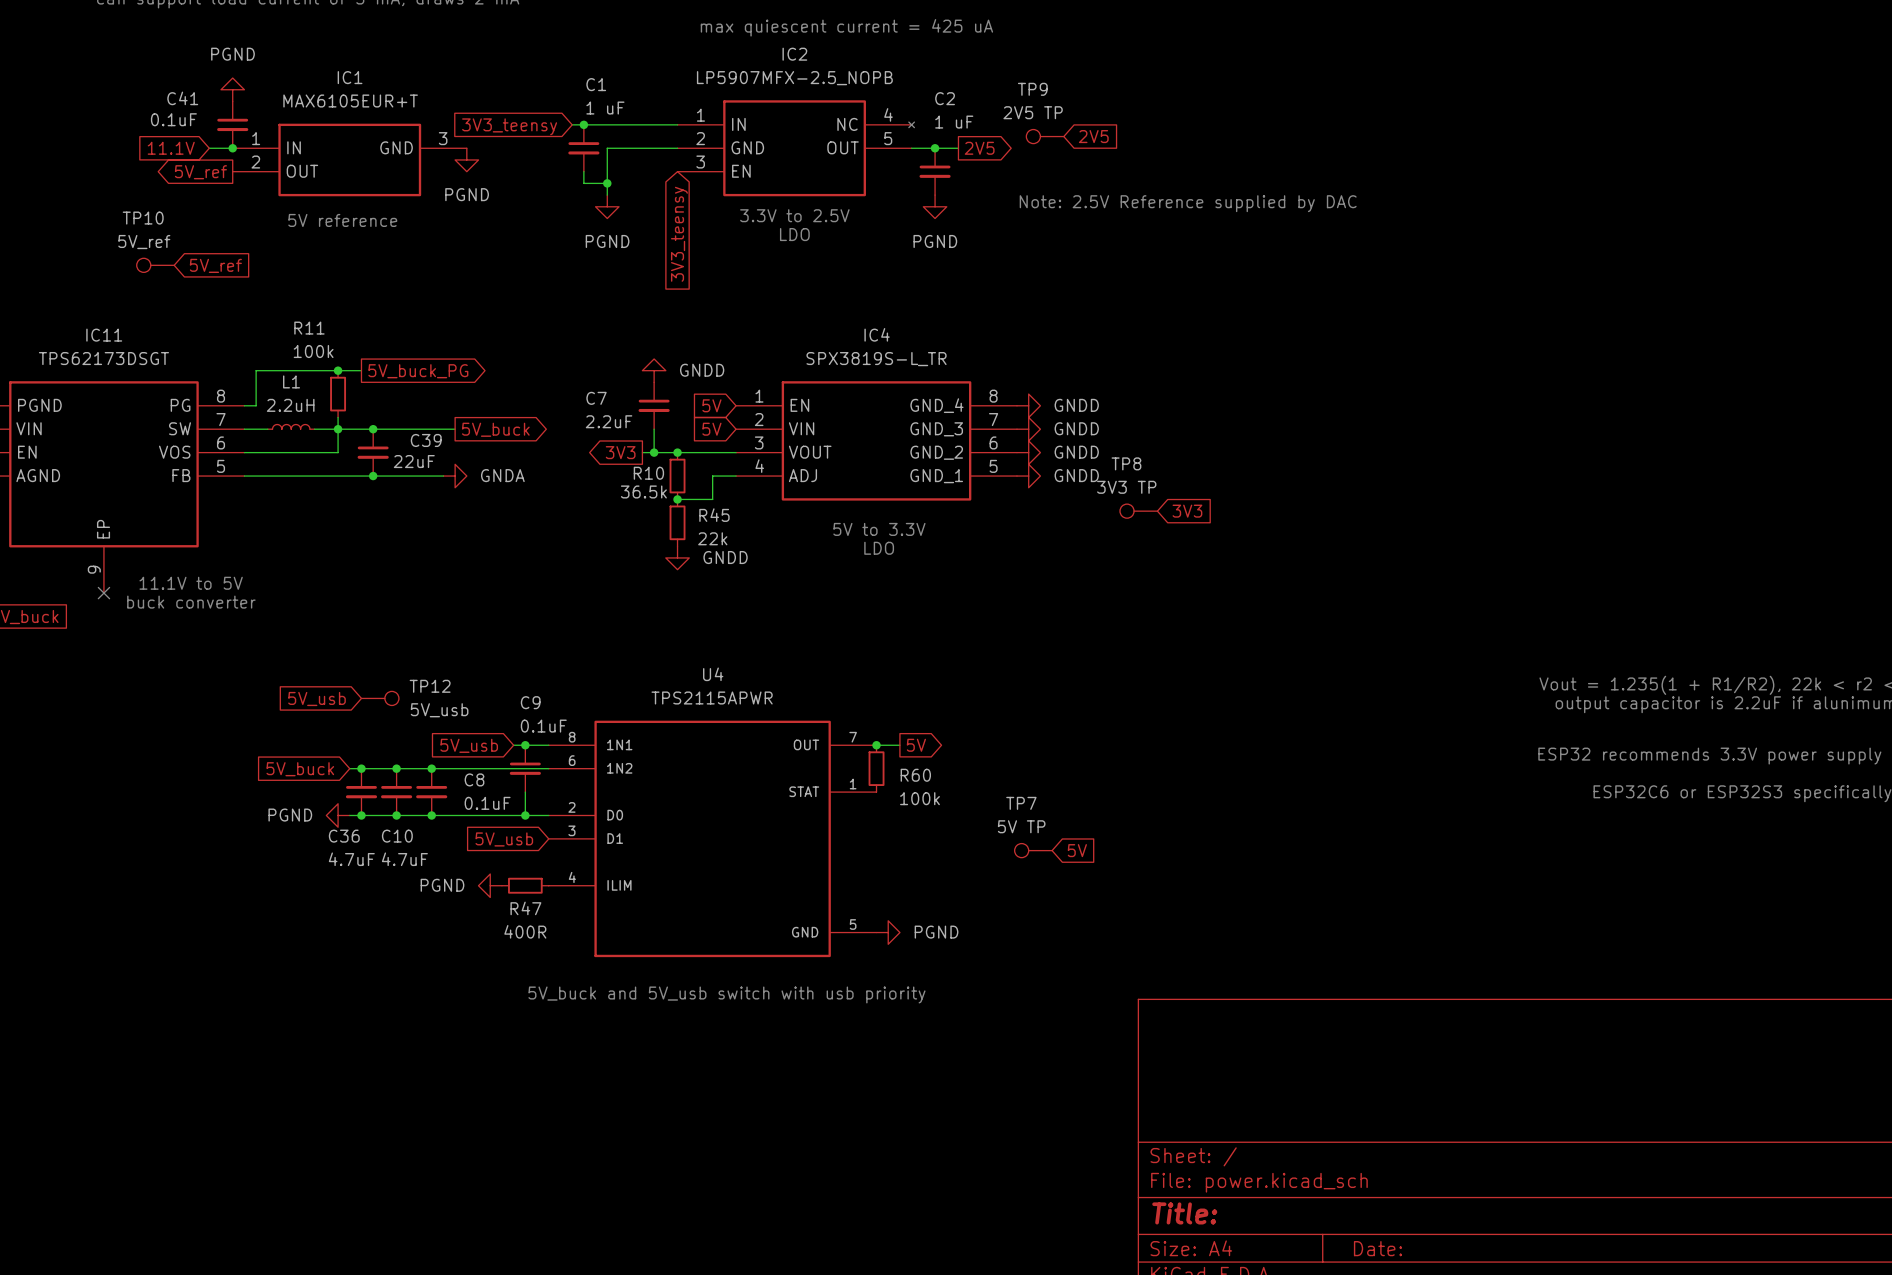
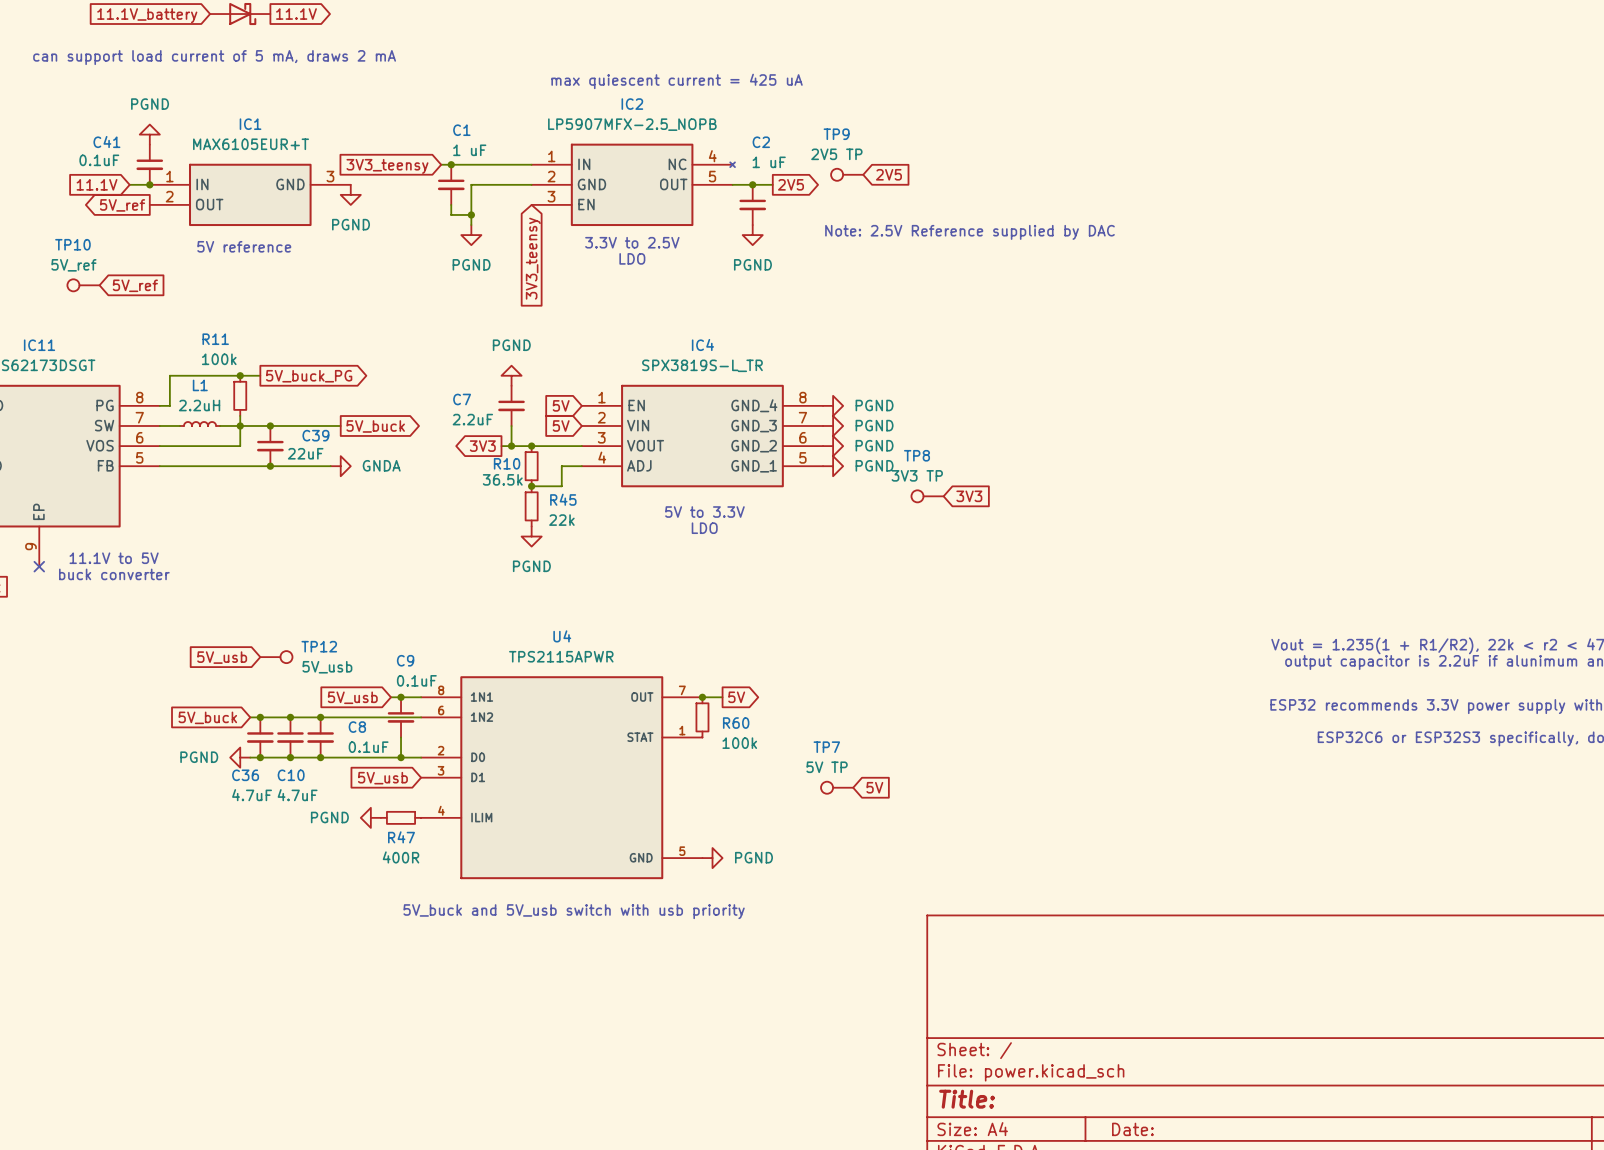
power symbol: GNDD (654, 370) -> PGND (511, 375)
power symbol: GNDD (1028, 405) -> PGND (833, 405)
power symbol: GNDD (1028, 429) -> PGND (833, 425)
power symbol: GNDD (1028, 452) -> PGND (833, 446)
power symbol: GNDD (1028, 476) -> PGND (833, 466)
power symbol: GNDD (677, 557) -> PGND (531, 536)

